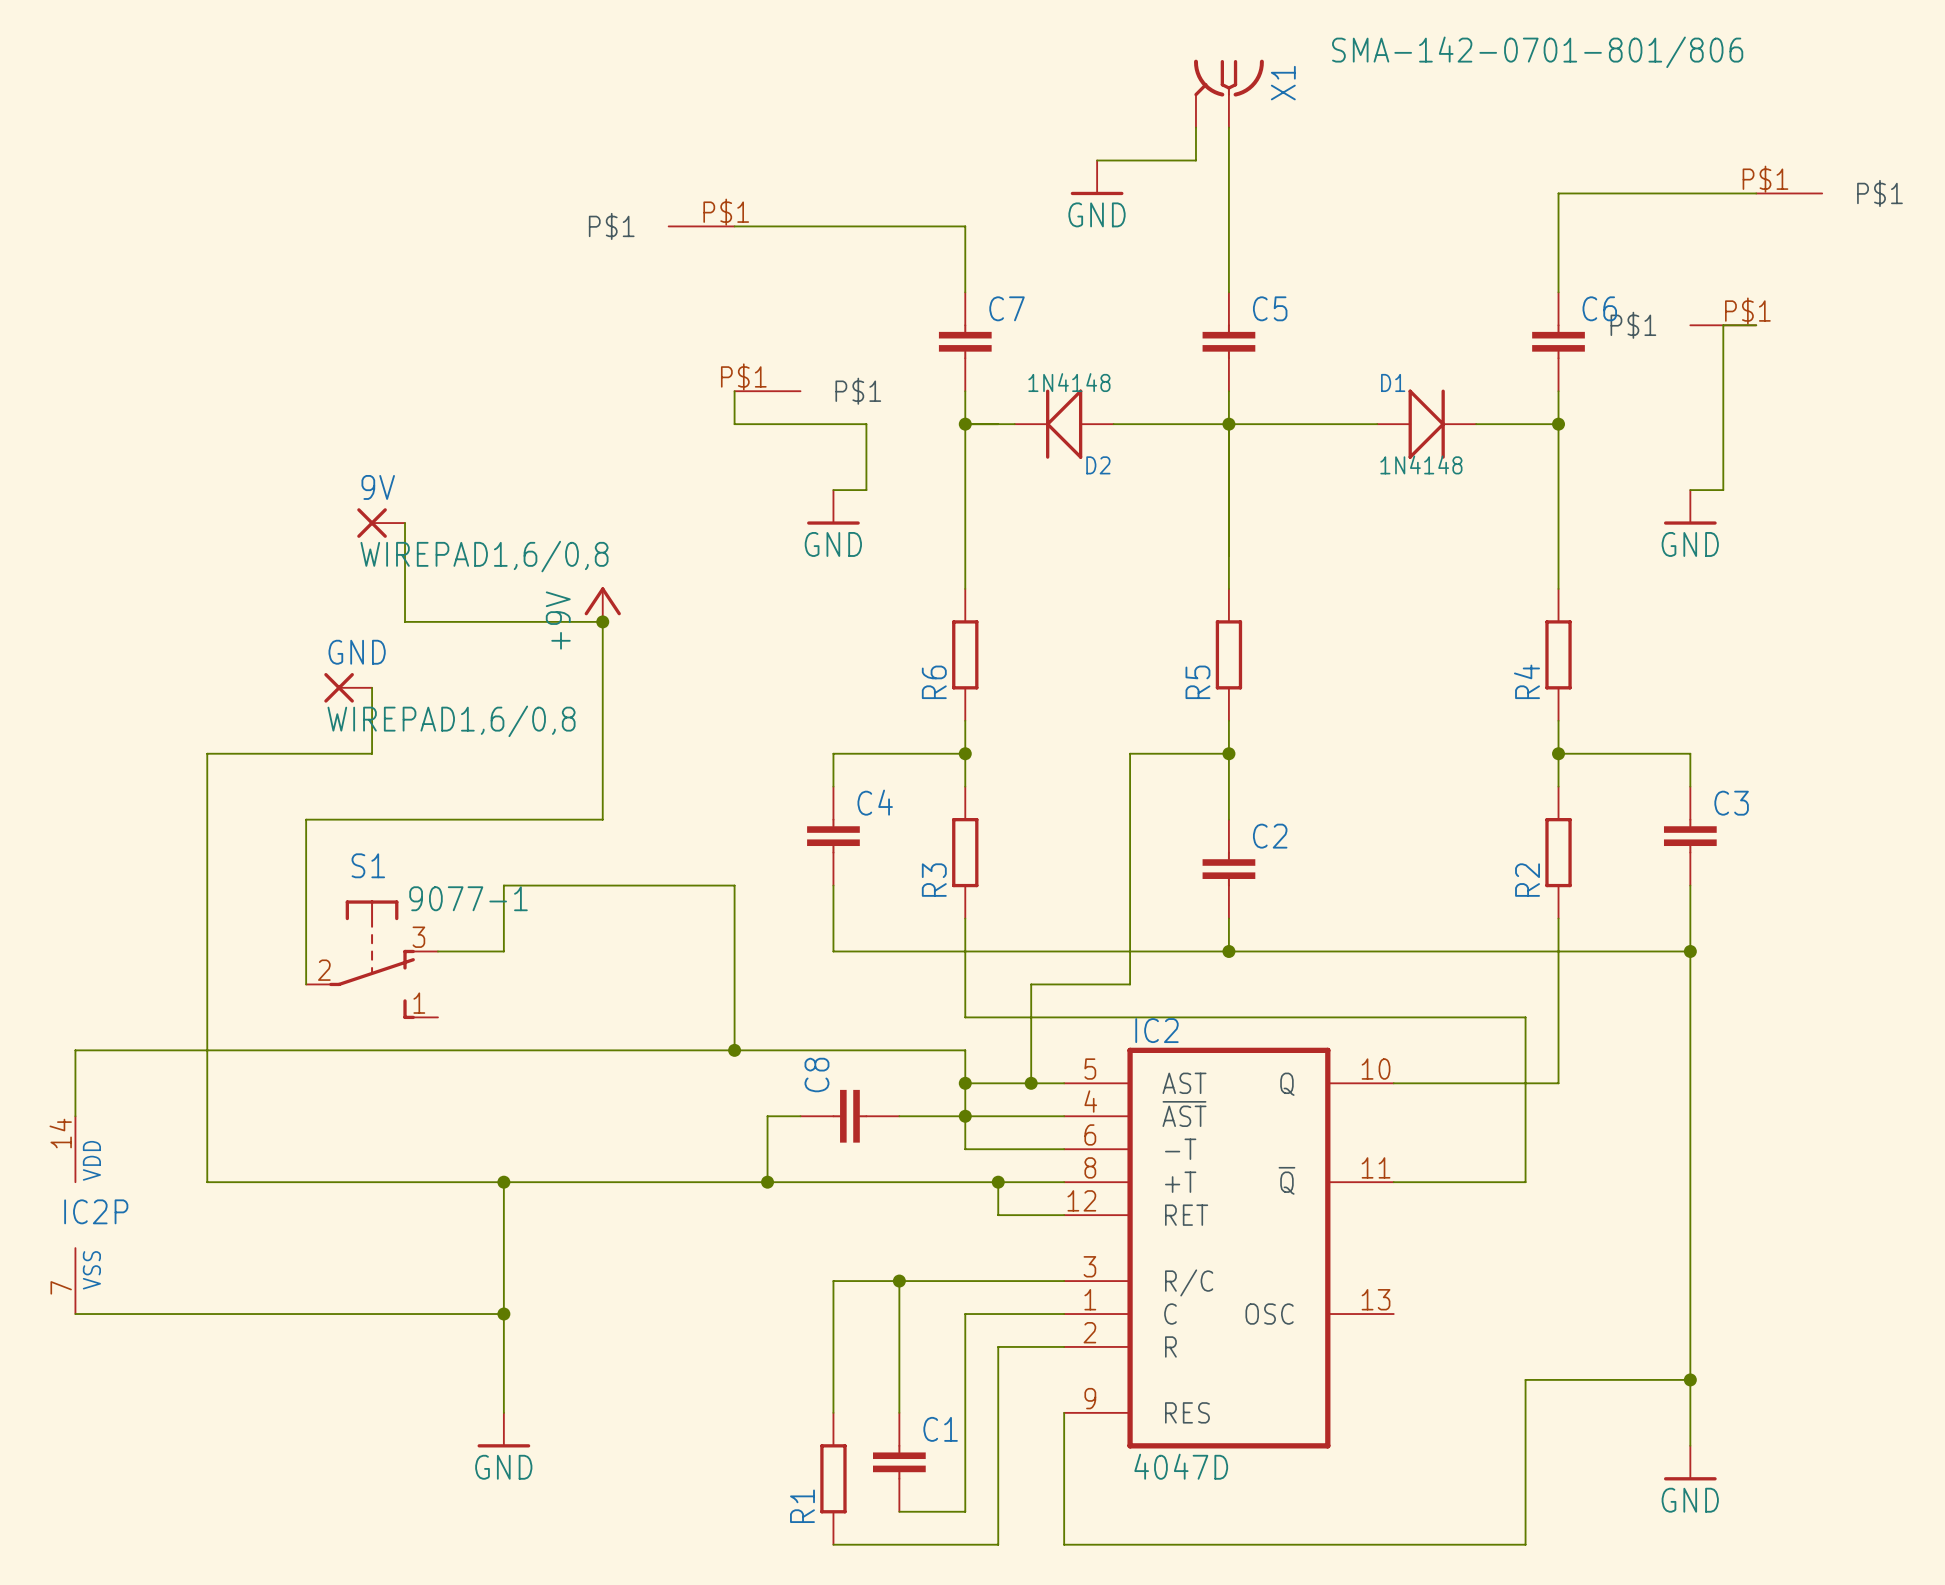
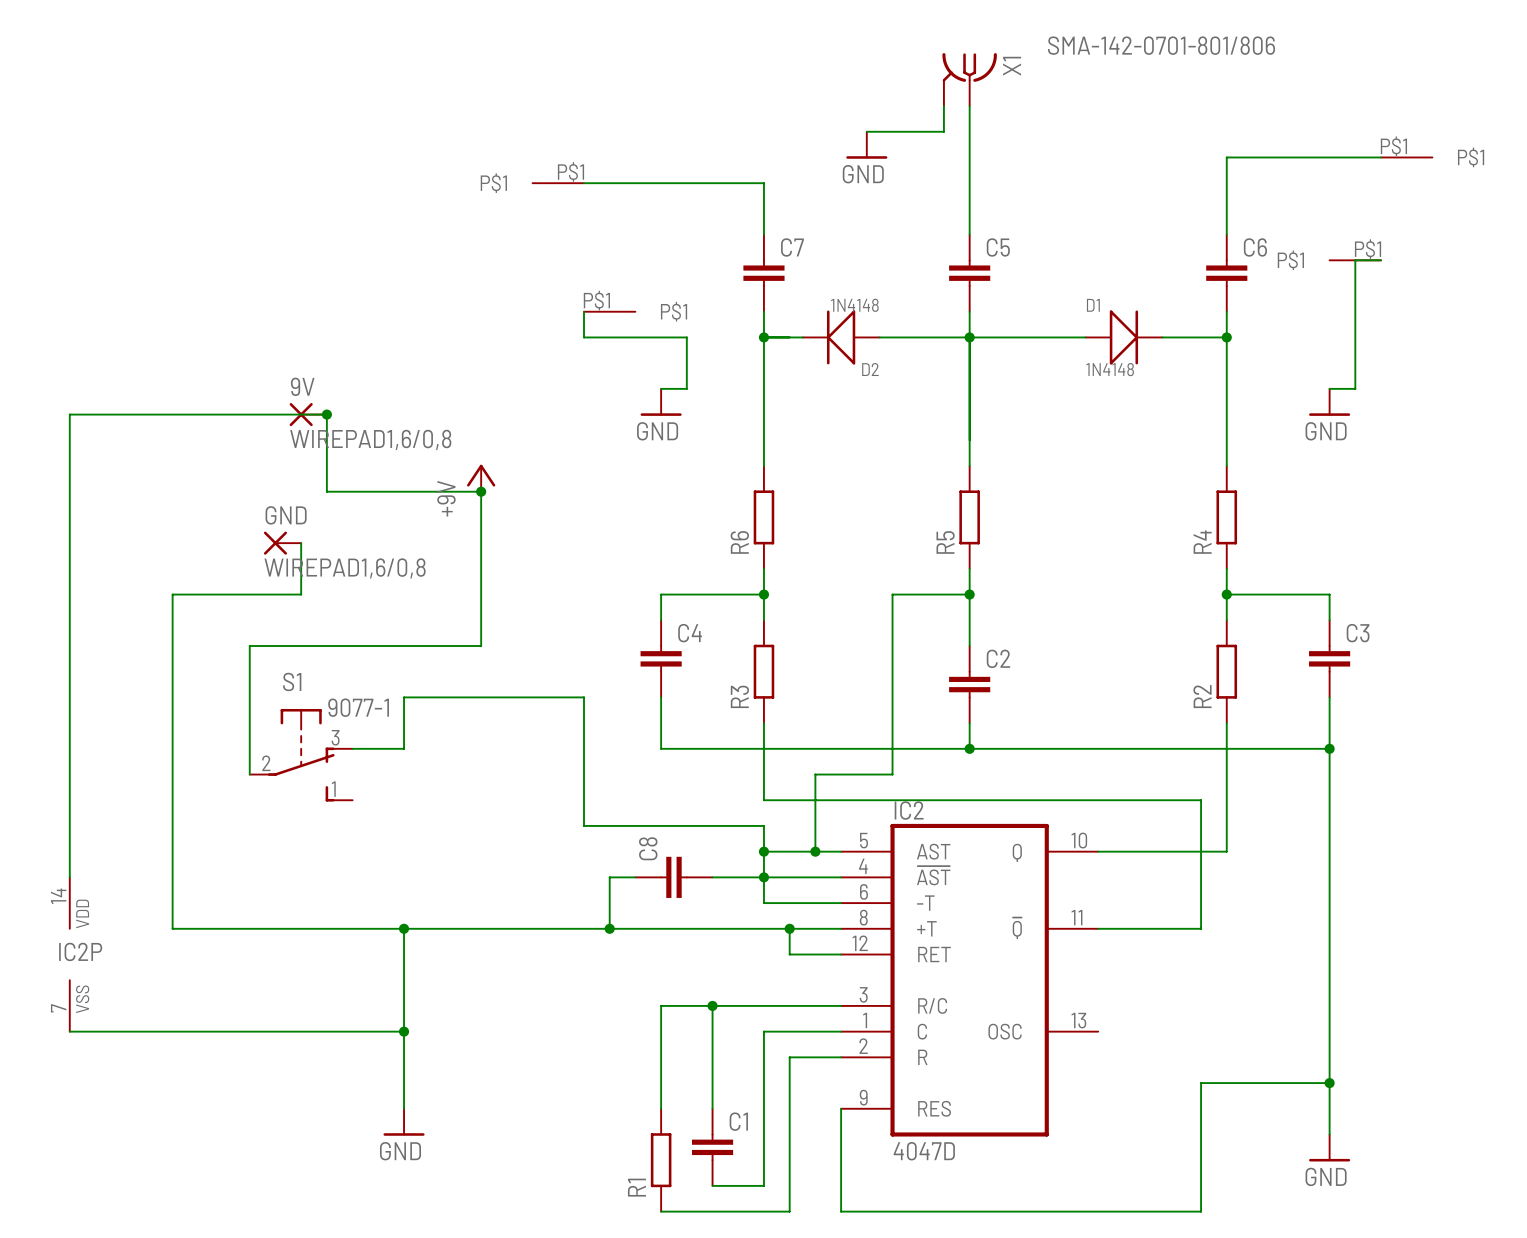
junction: none -> (326, 414)
wire: (75, 1050) (734, 1050) -> (69, 825) (69, 414) (326, 414)
junction: (734, 1050) -> none

